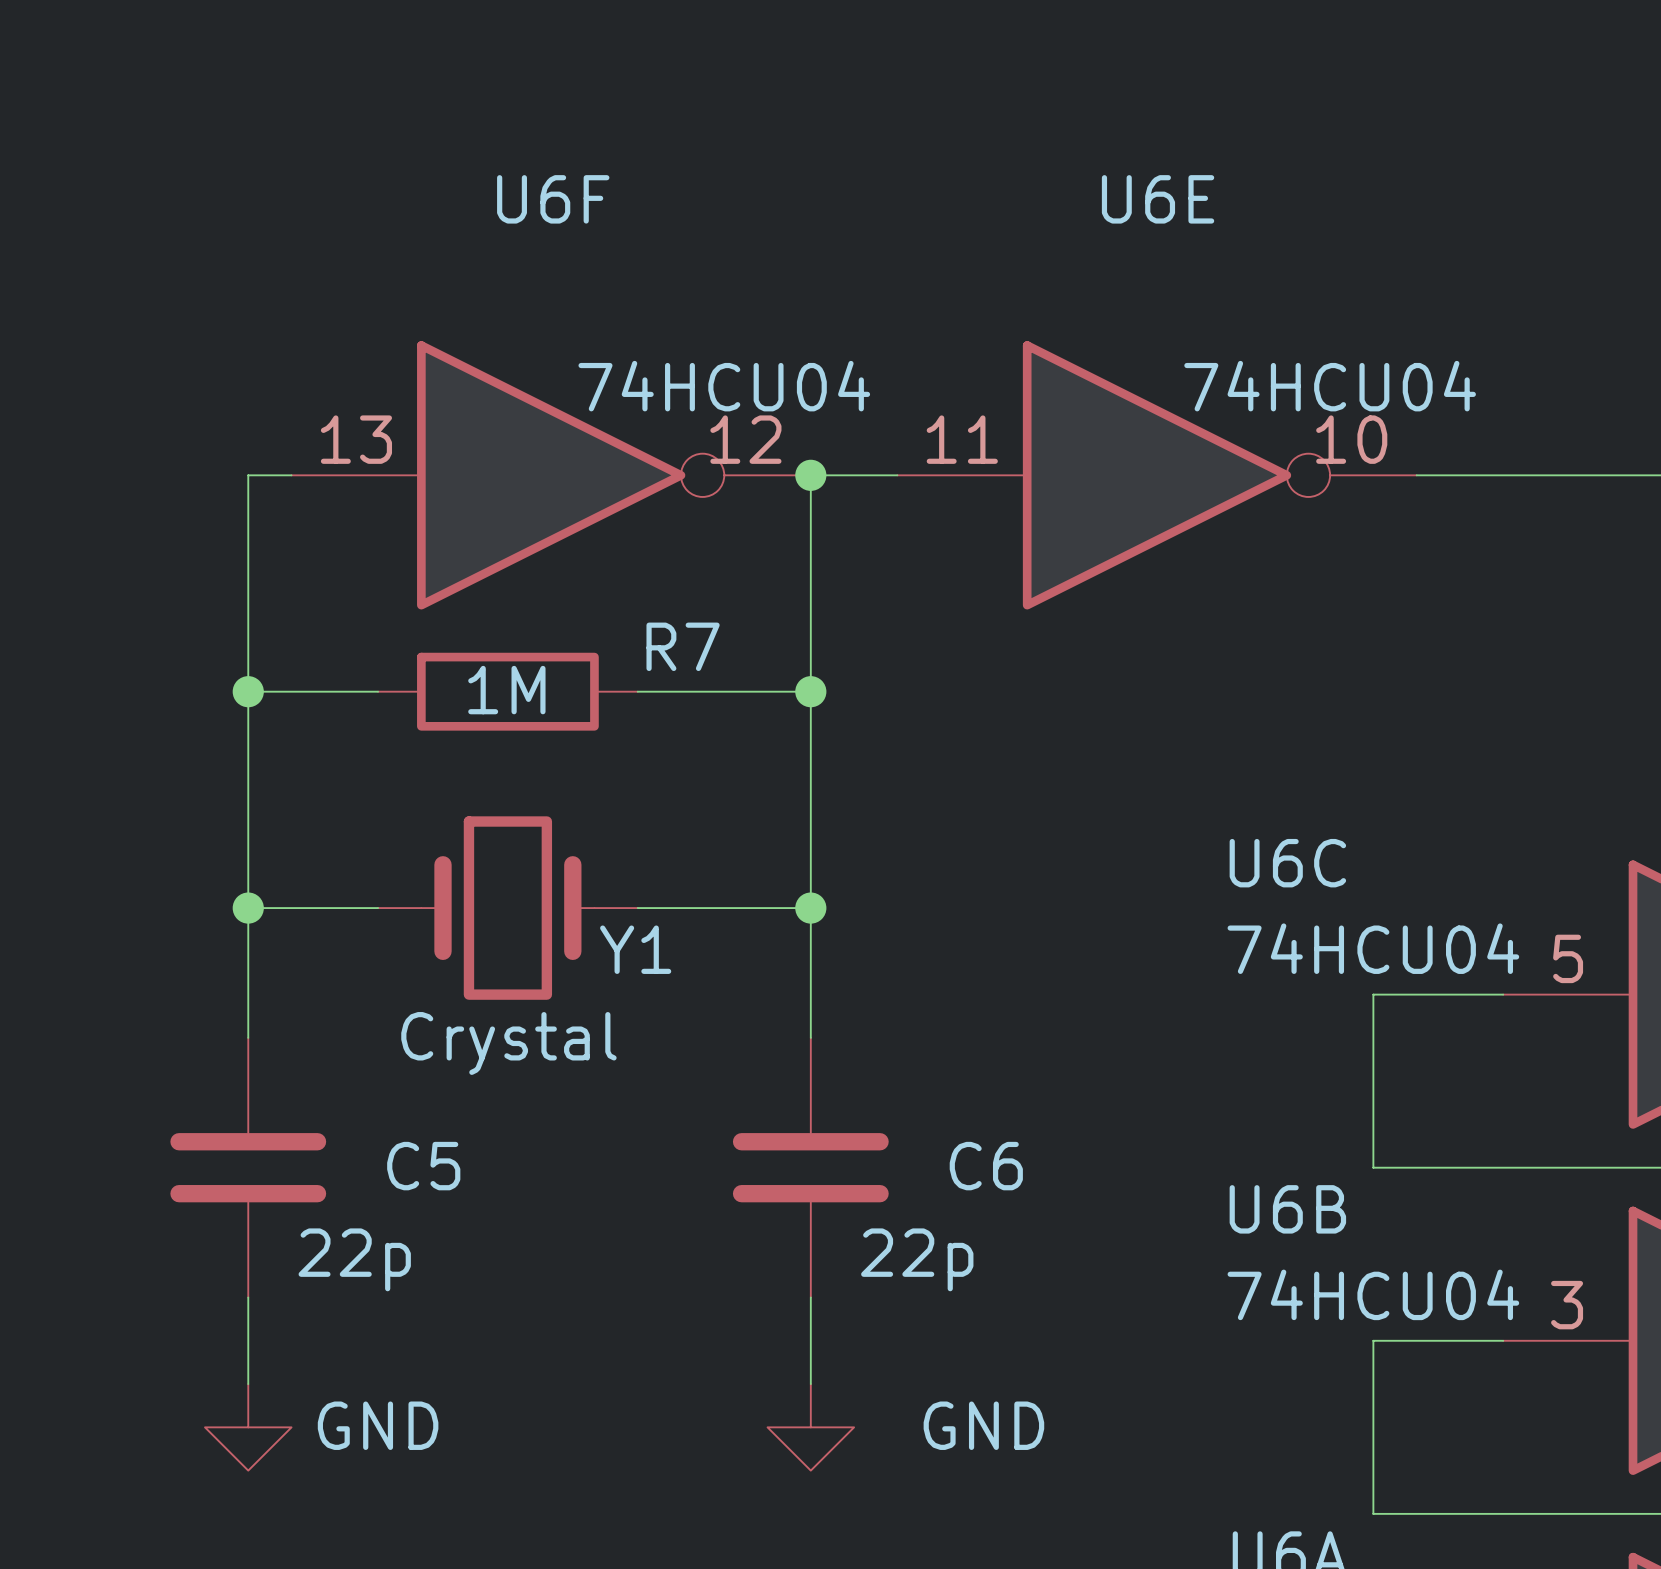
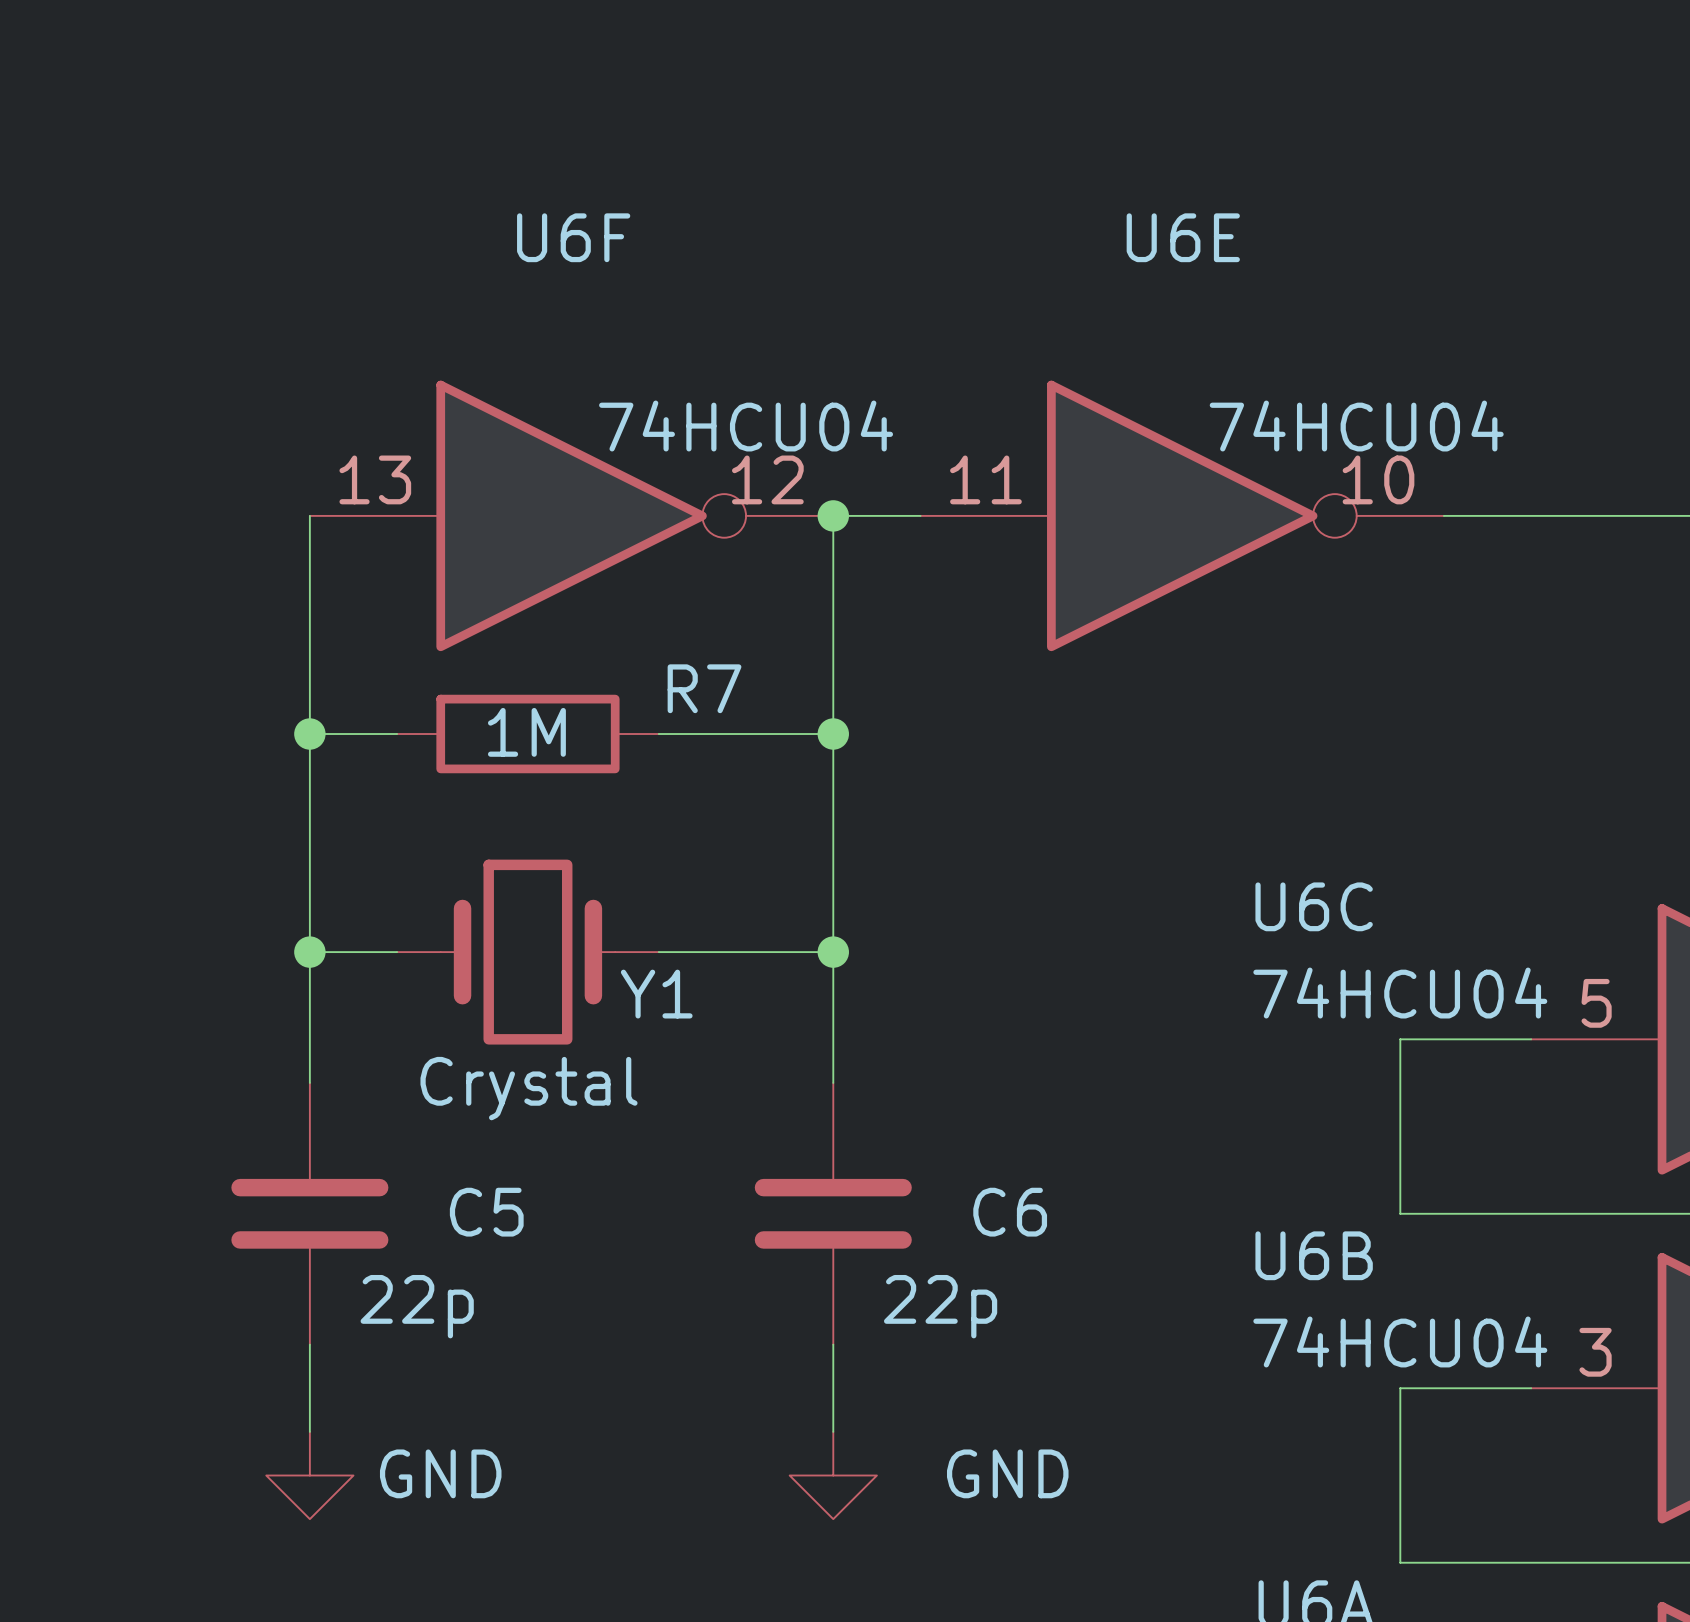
wire: (291, 475) (248, 475) (248, 1037) -> (309, 515) (309, 1082)
wire: (248, 691) (291, 691) -> none
junction position: (248, 691) -> (309, 734)
wire: (248, 908) (291, 908) -> none
junction position: (248, 908) -> (309, 952)
C5 position: (248, 1167) -> (309, 1213)
wire: (248, 1297) (248, 1384) -> (309, 1344) (309, 1431)
power symbol position: GND (248, 1427) -> GND (309, 1475)

